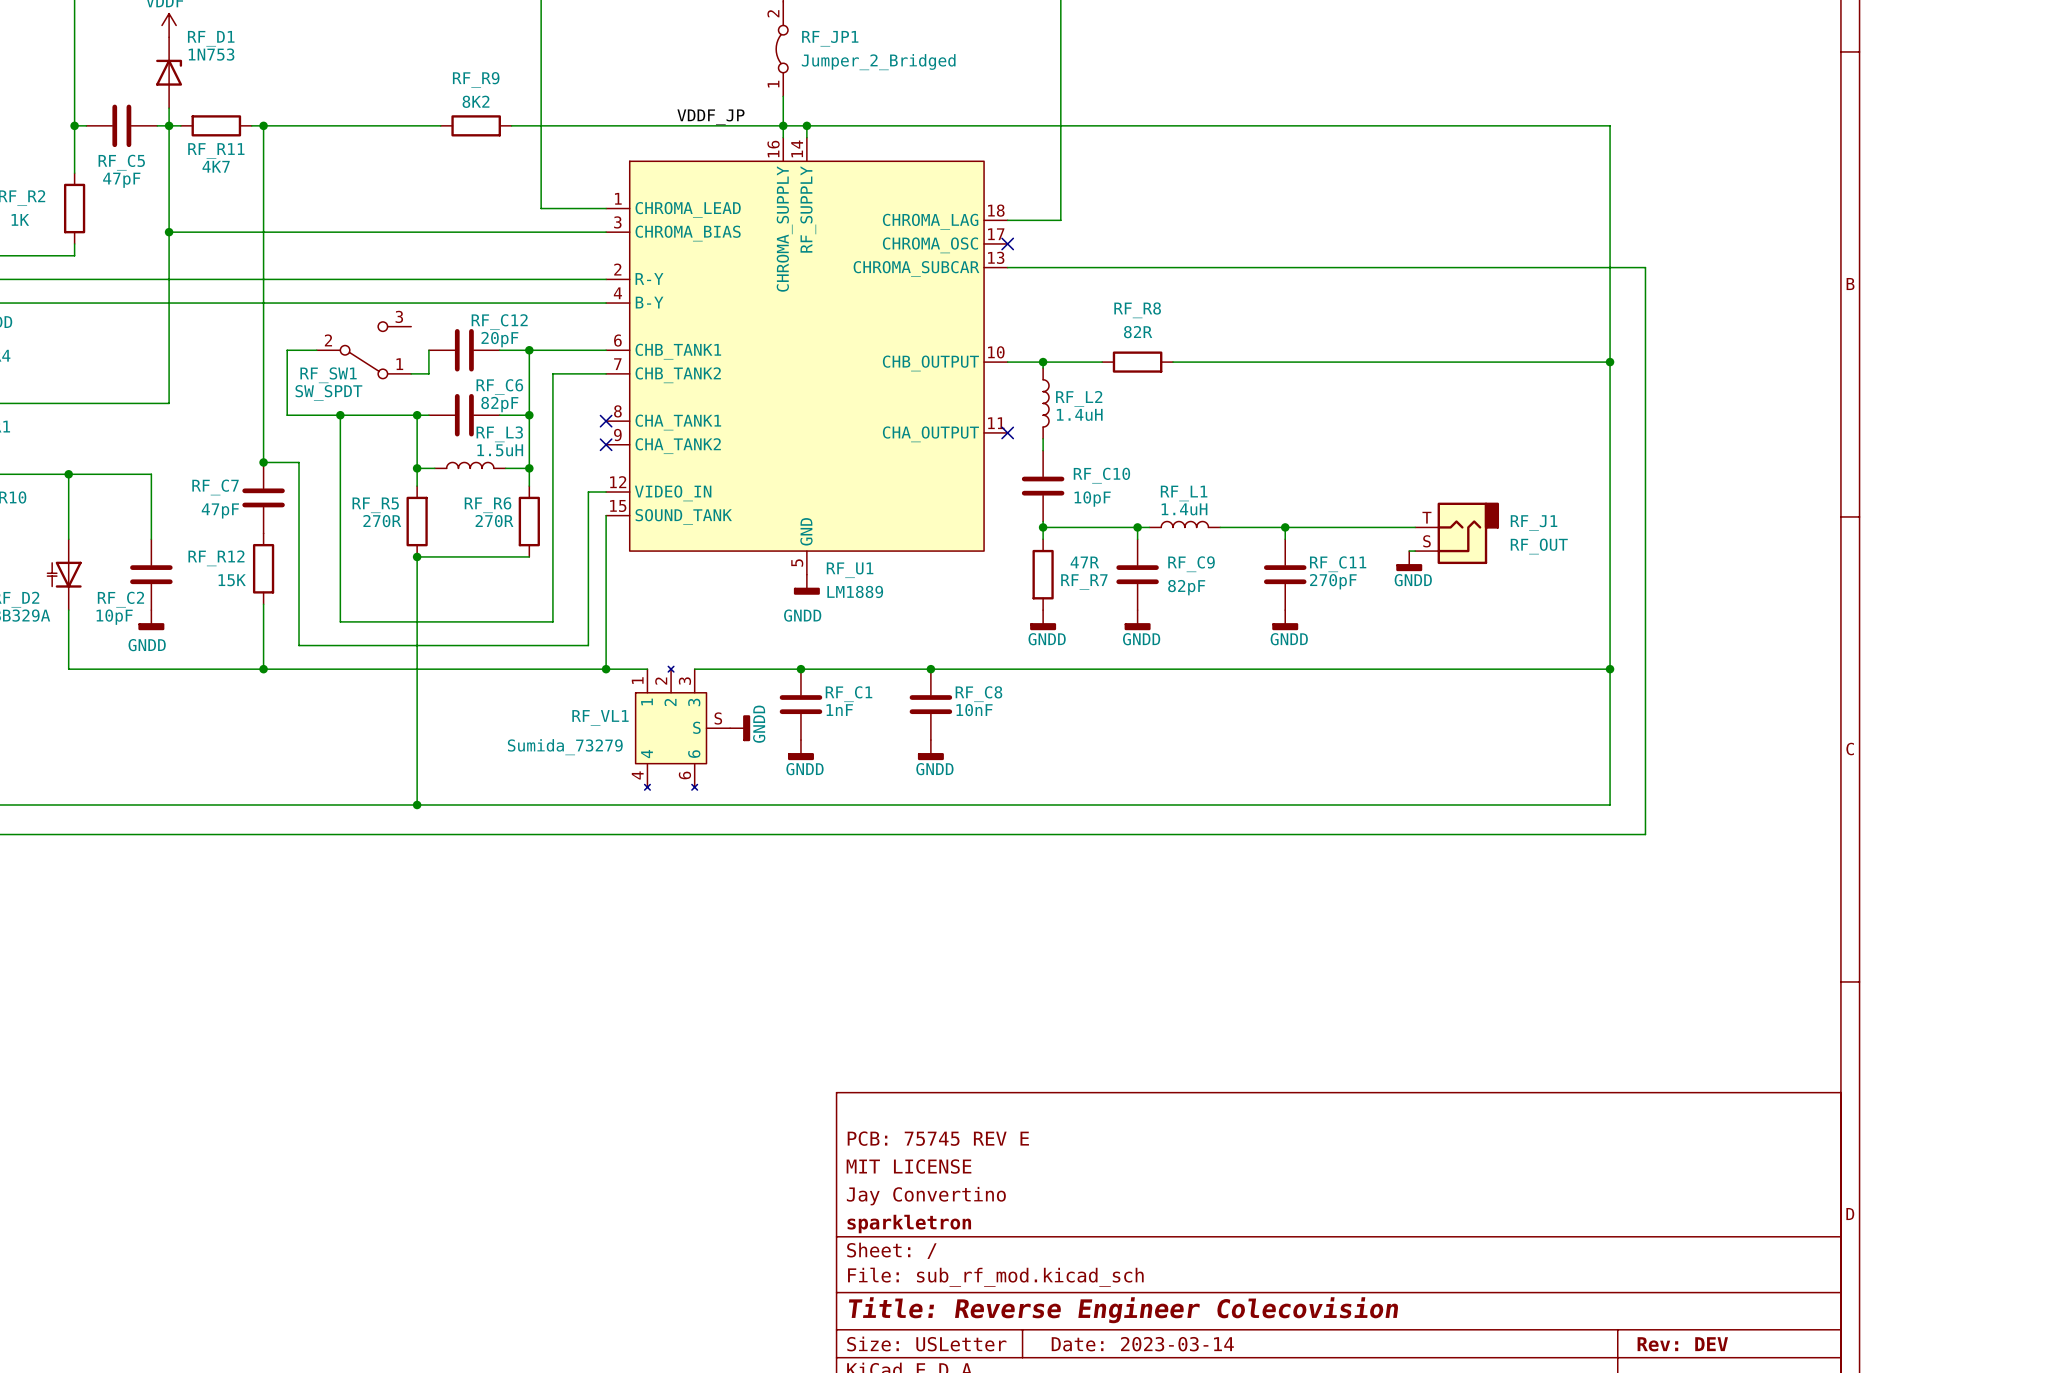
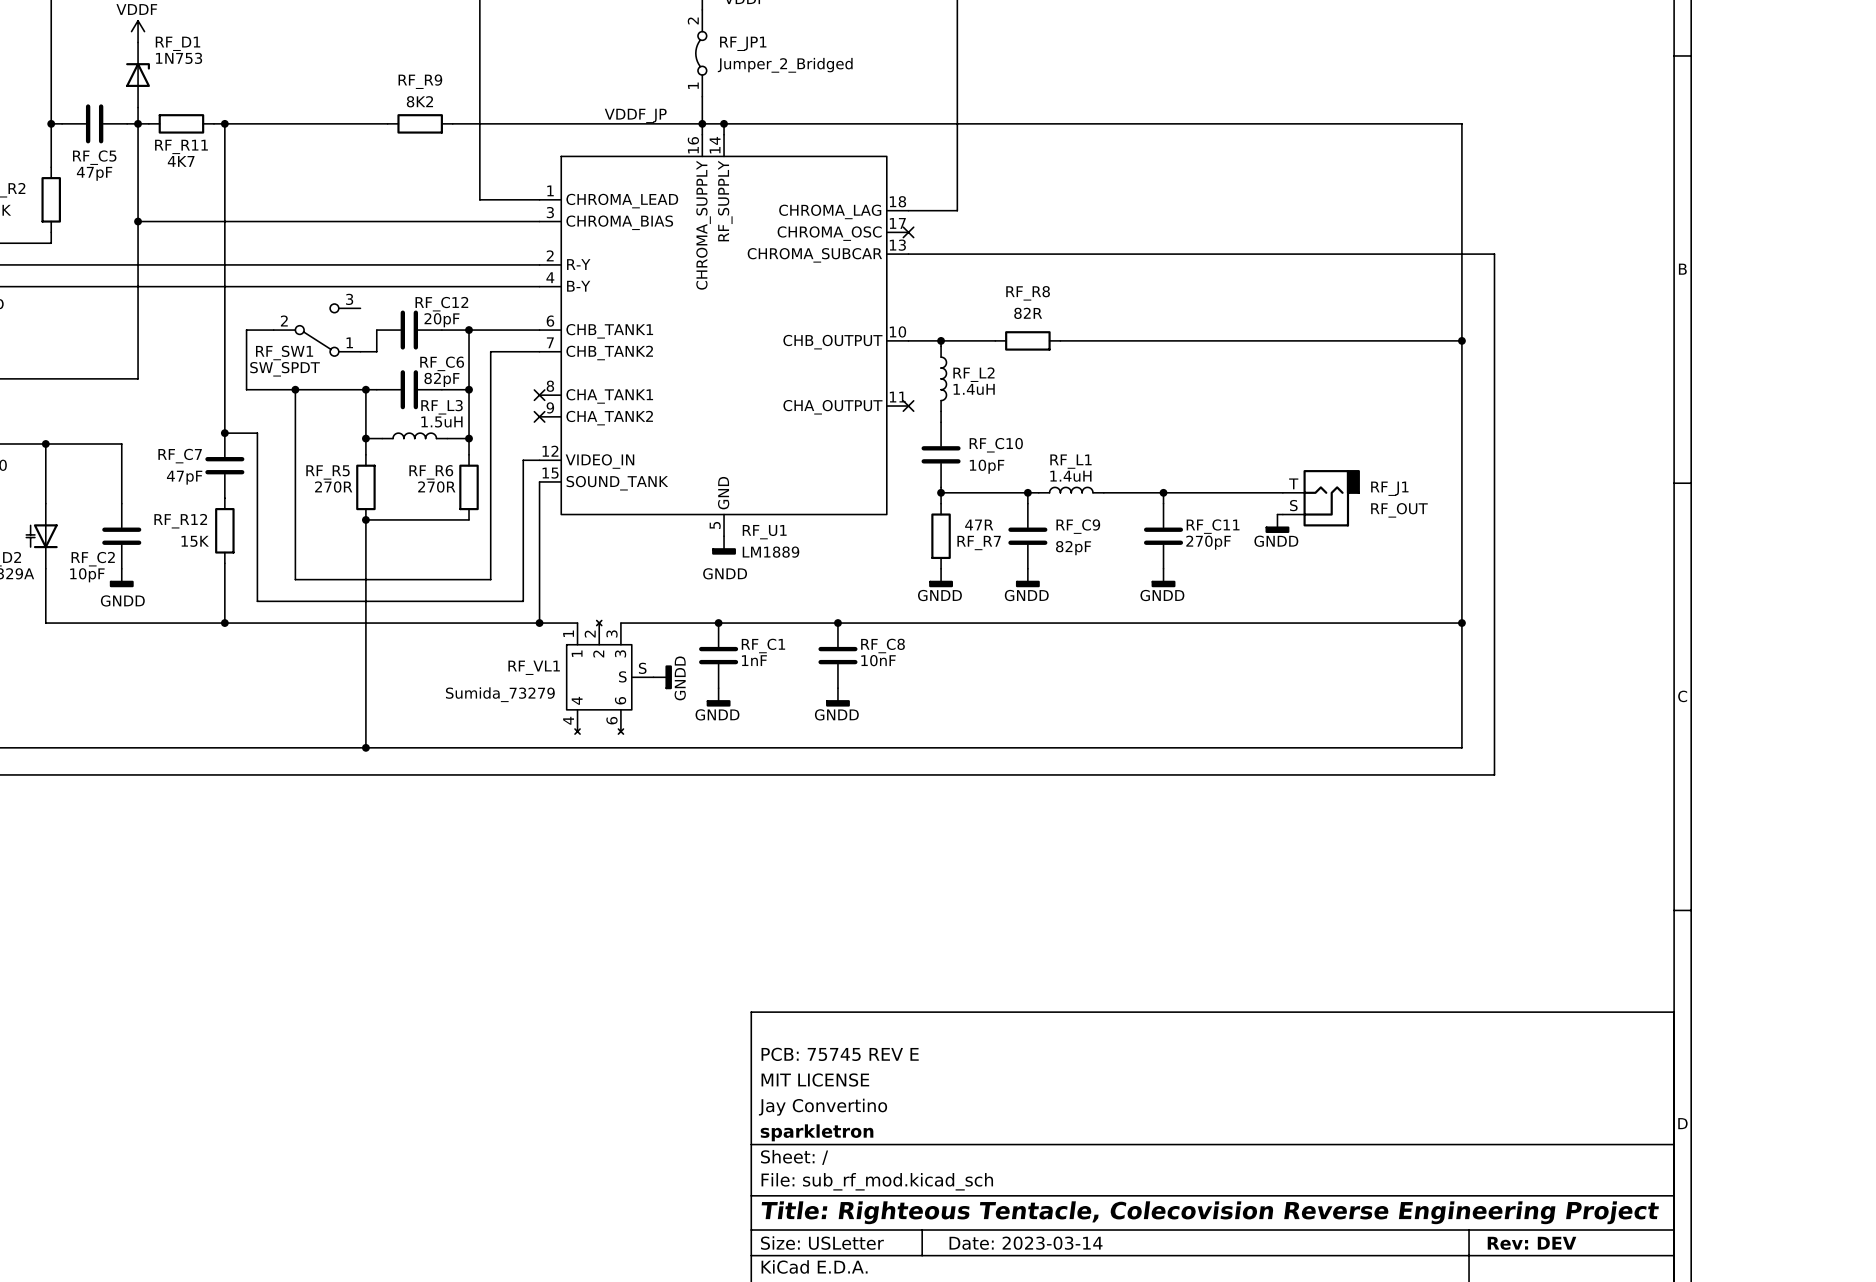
title block: Title: Reverse Engineer Colecovision (1123, 1310) -> Title: Righteous Tentacle, Colecovision Reverse Engineering Project (1210, 1212)

